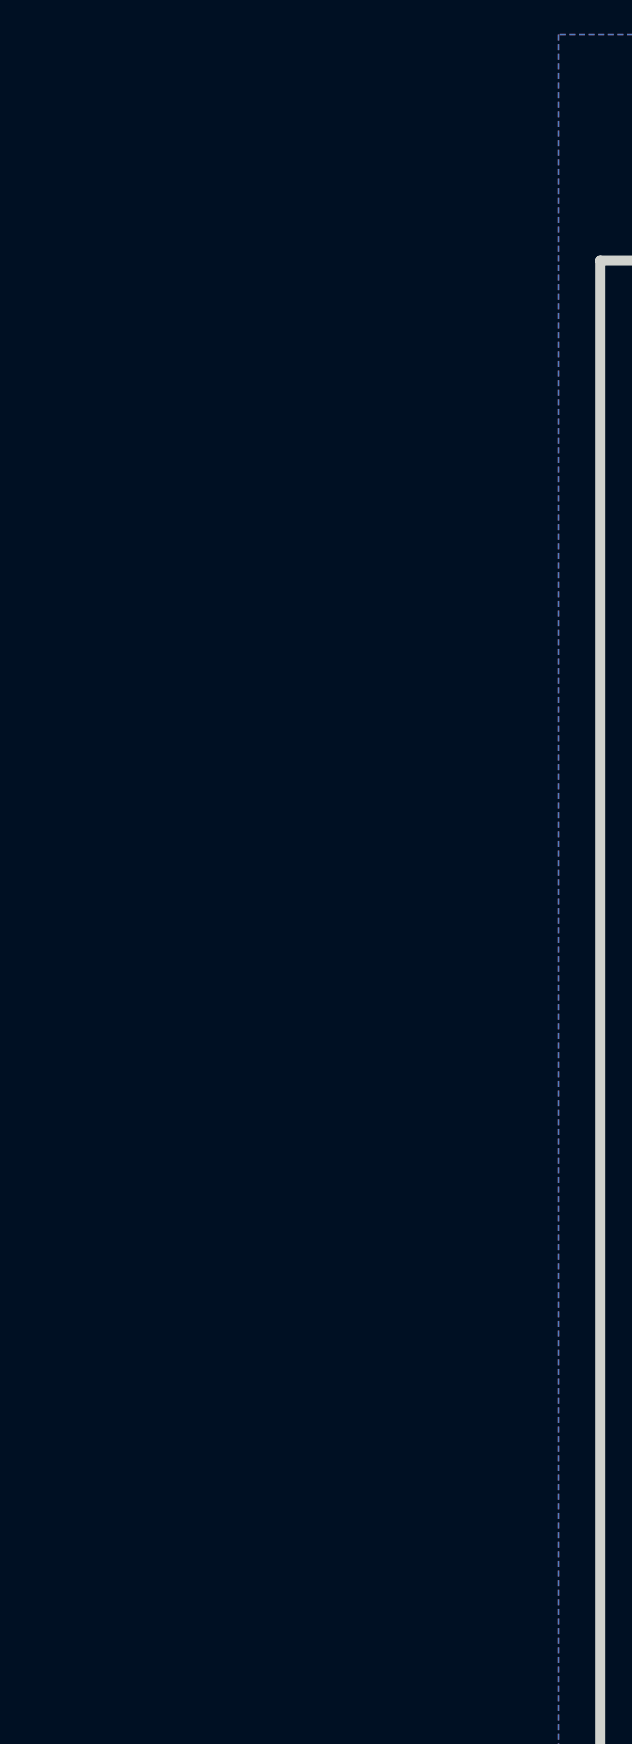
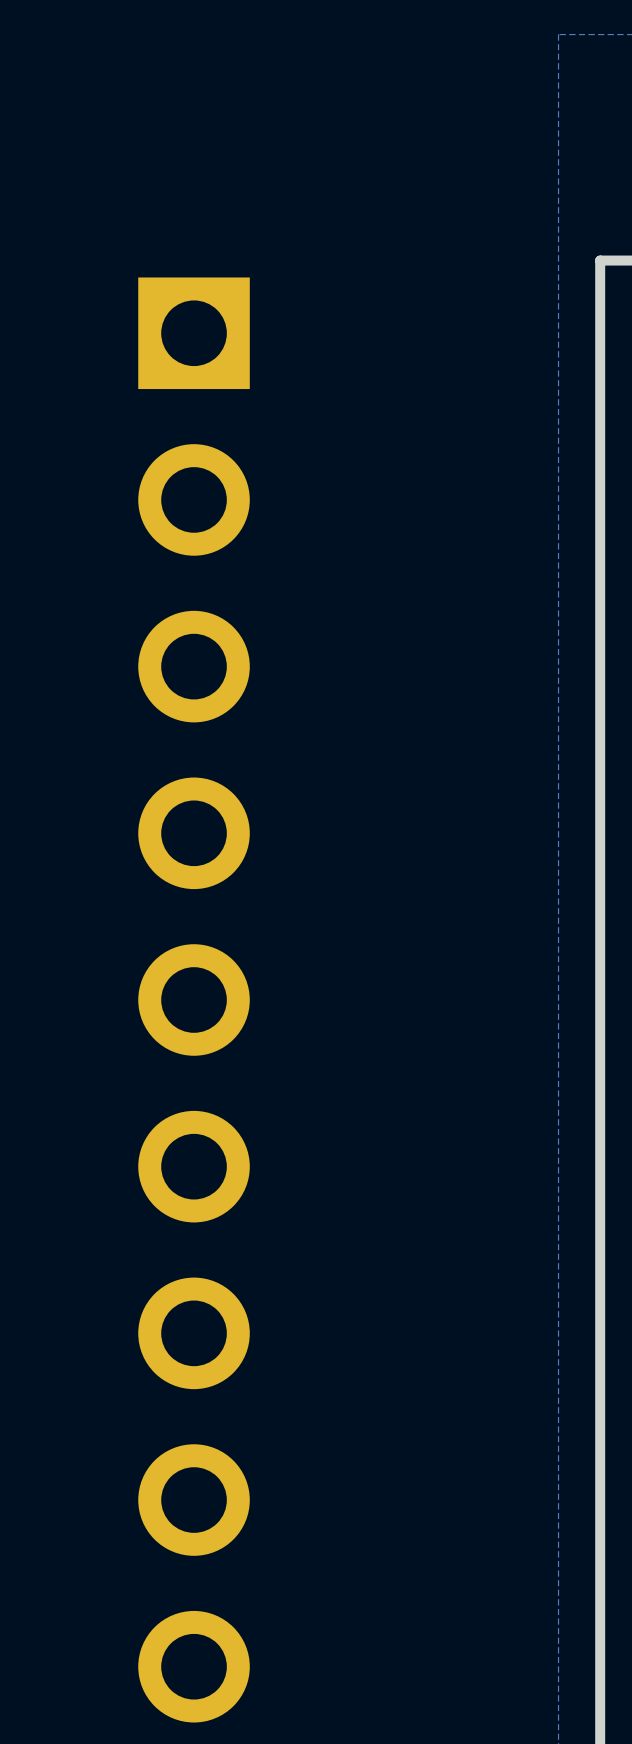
part: none -> (194, 999)

